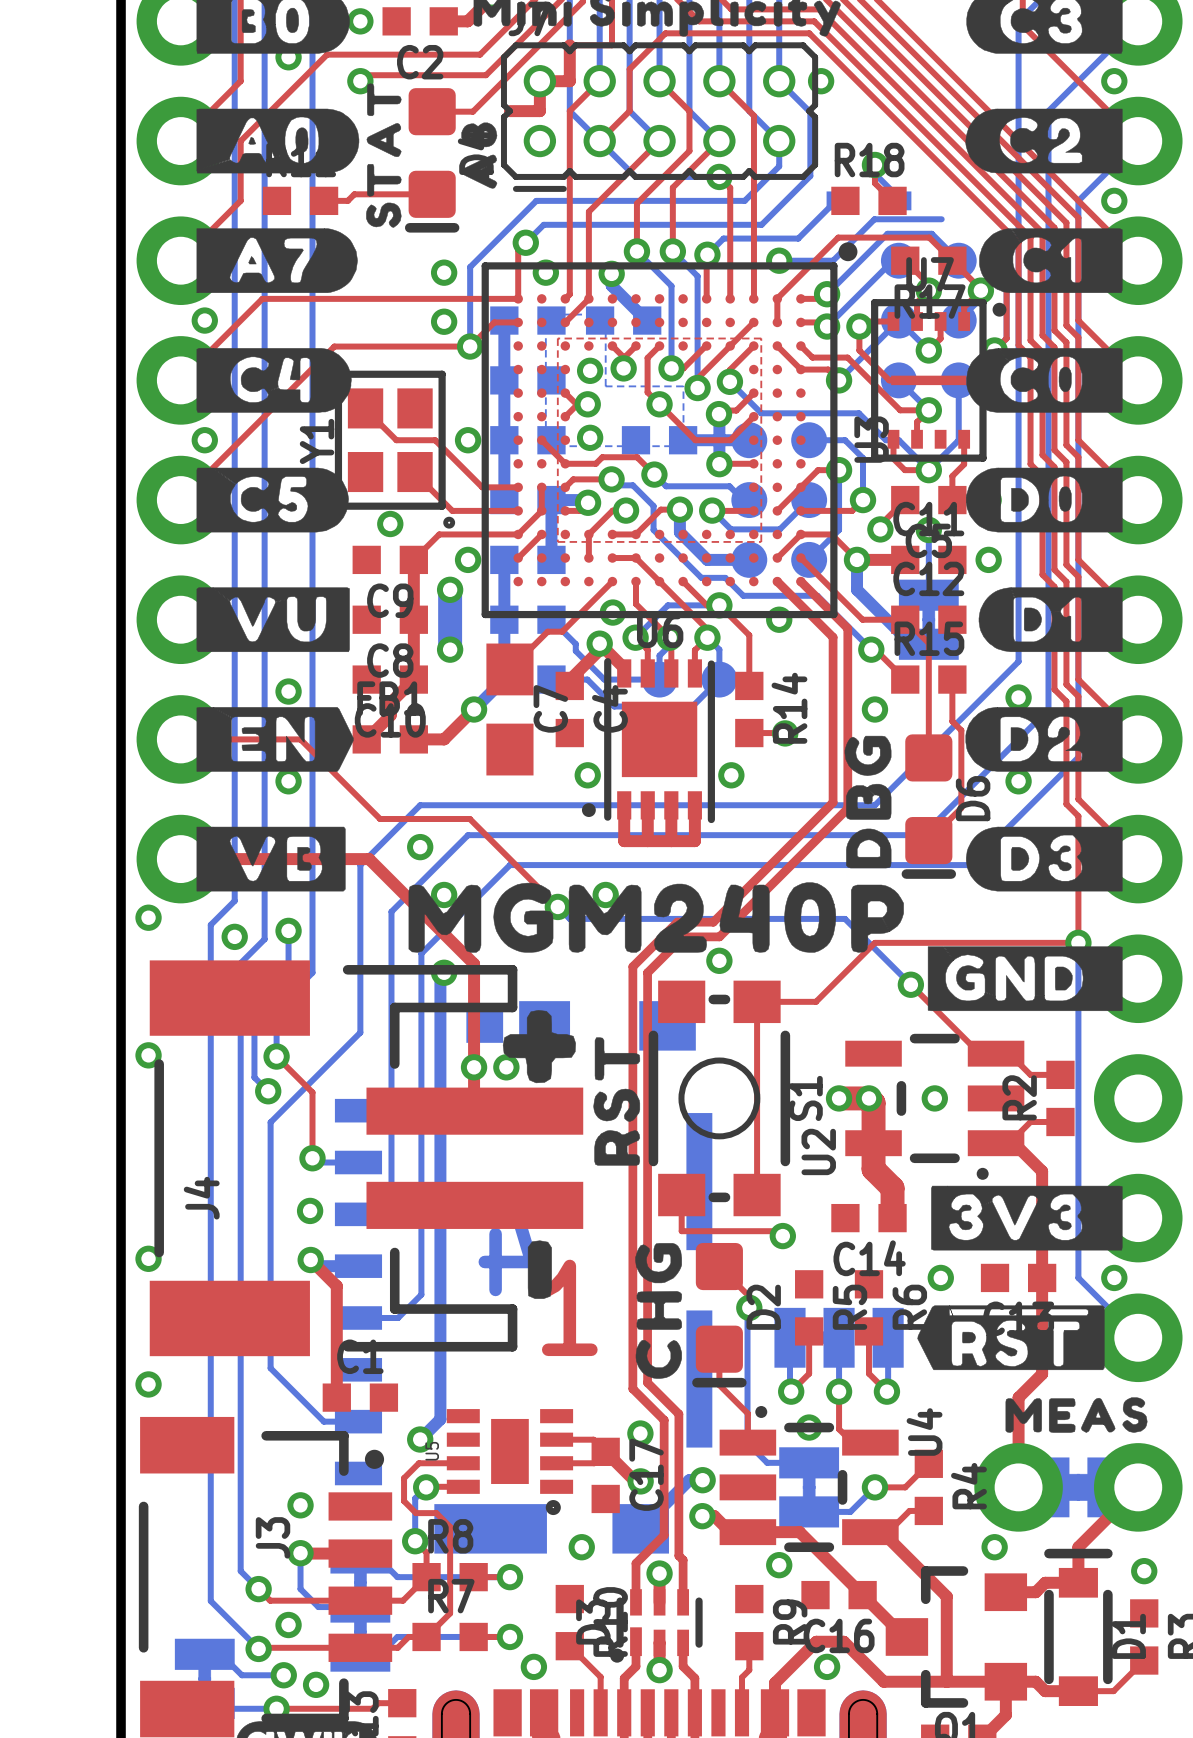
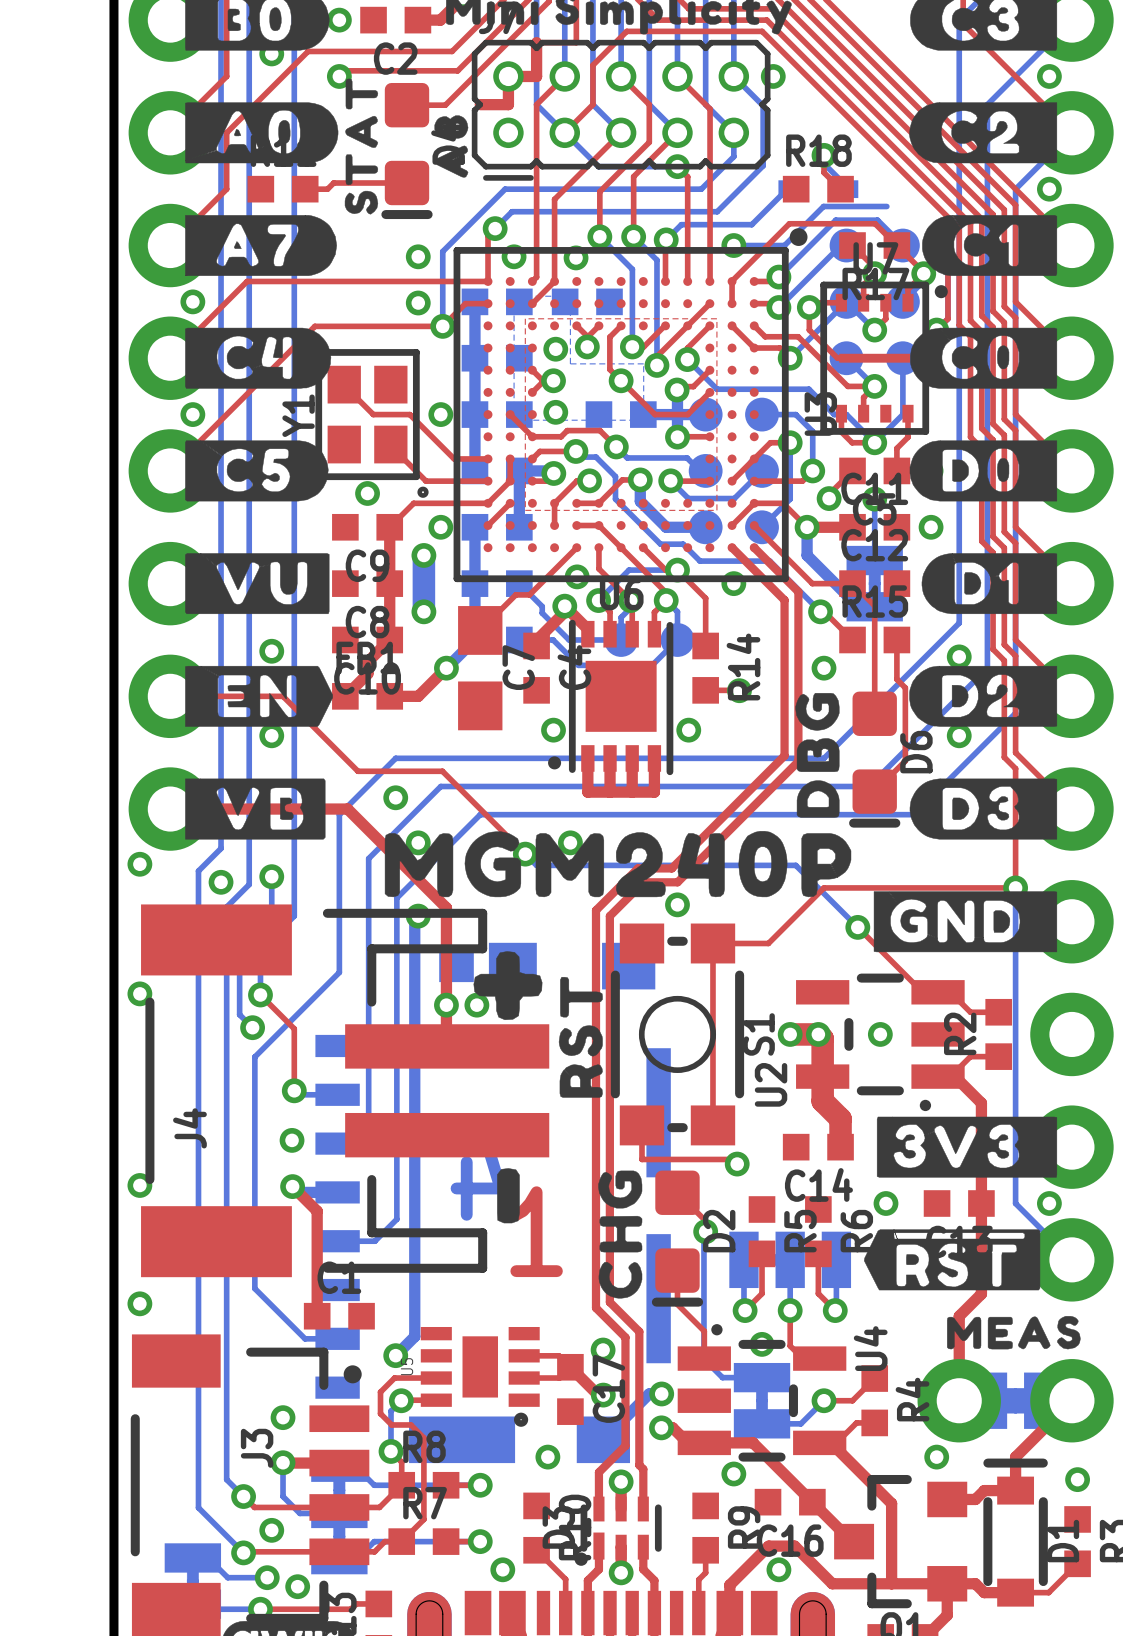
bottom track: (611, 273) (611, 285) (646, 320) -> none

